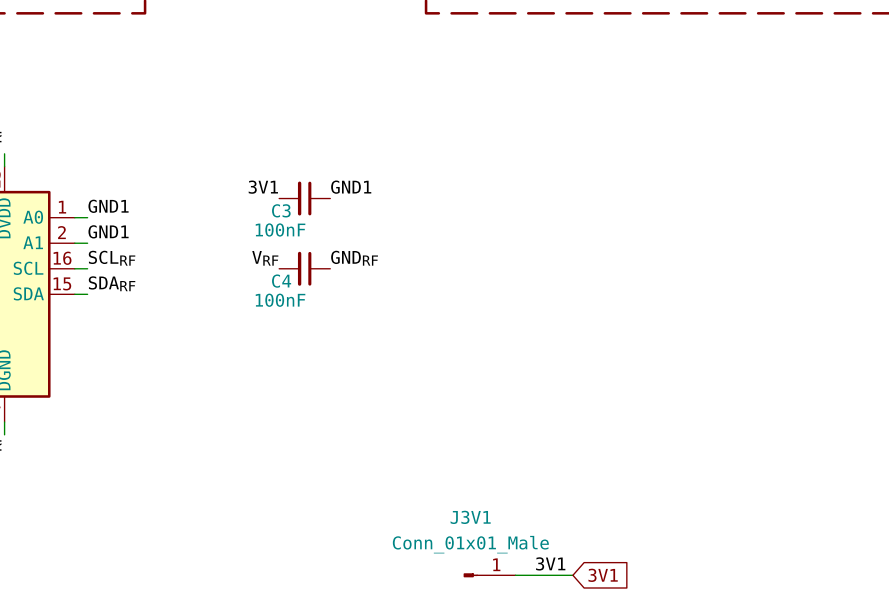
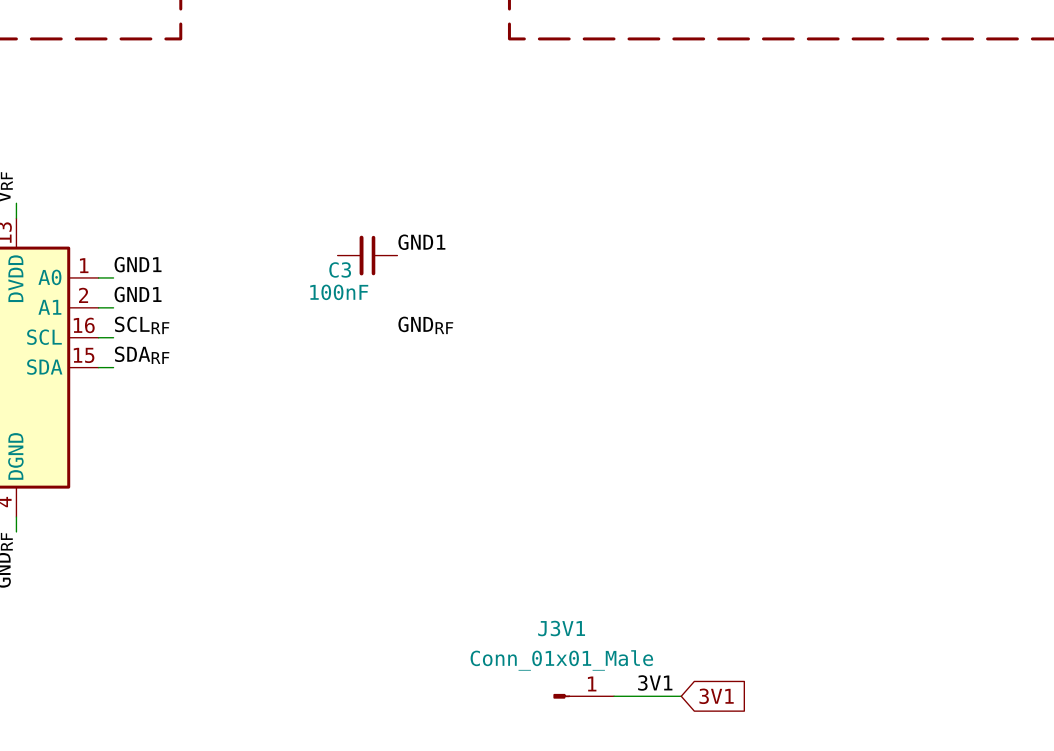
label: 3V1 (263, 187) -> none
label: VRF (265, 258) -> none
C4: 100nF (304, 268) -> none

